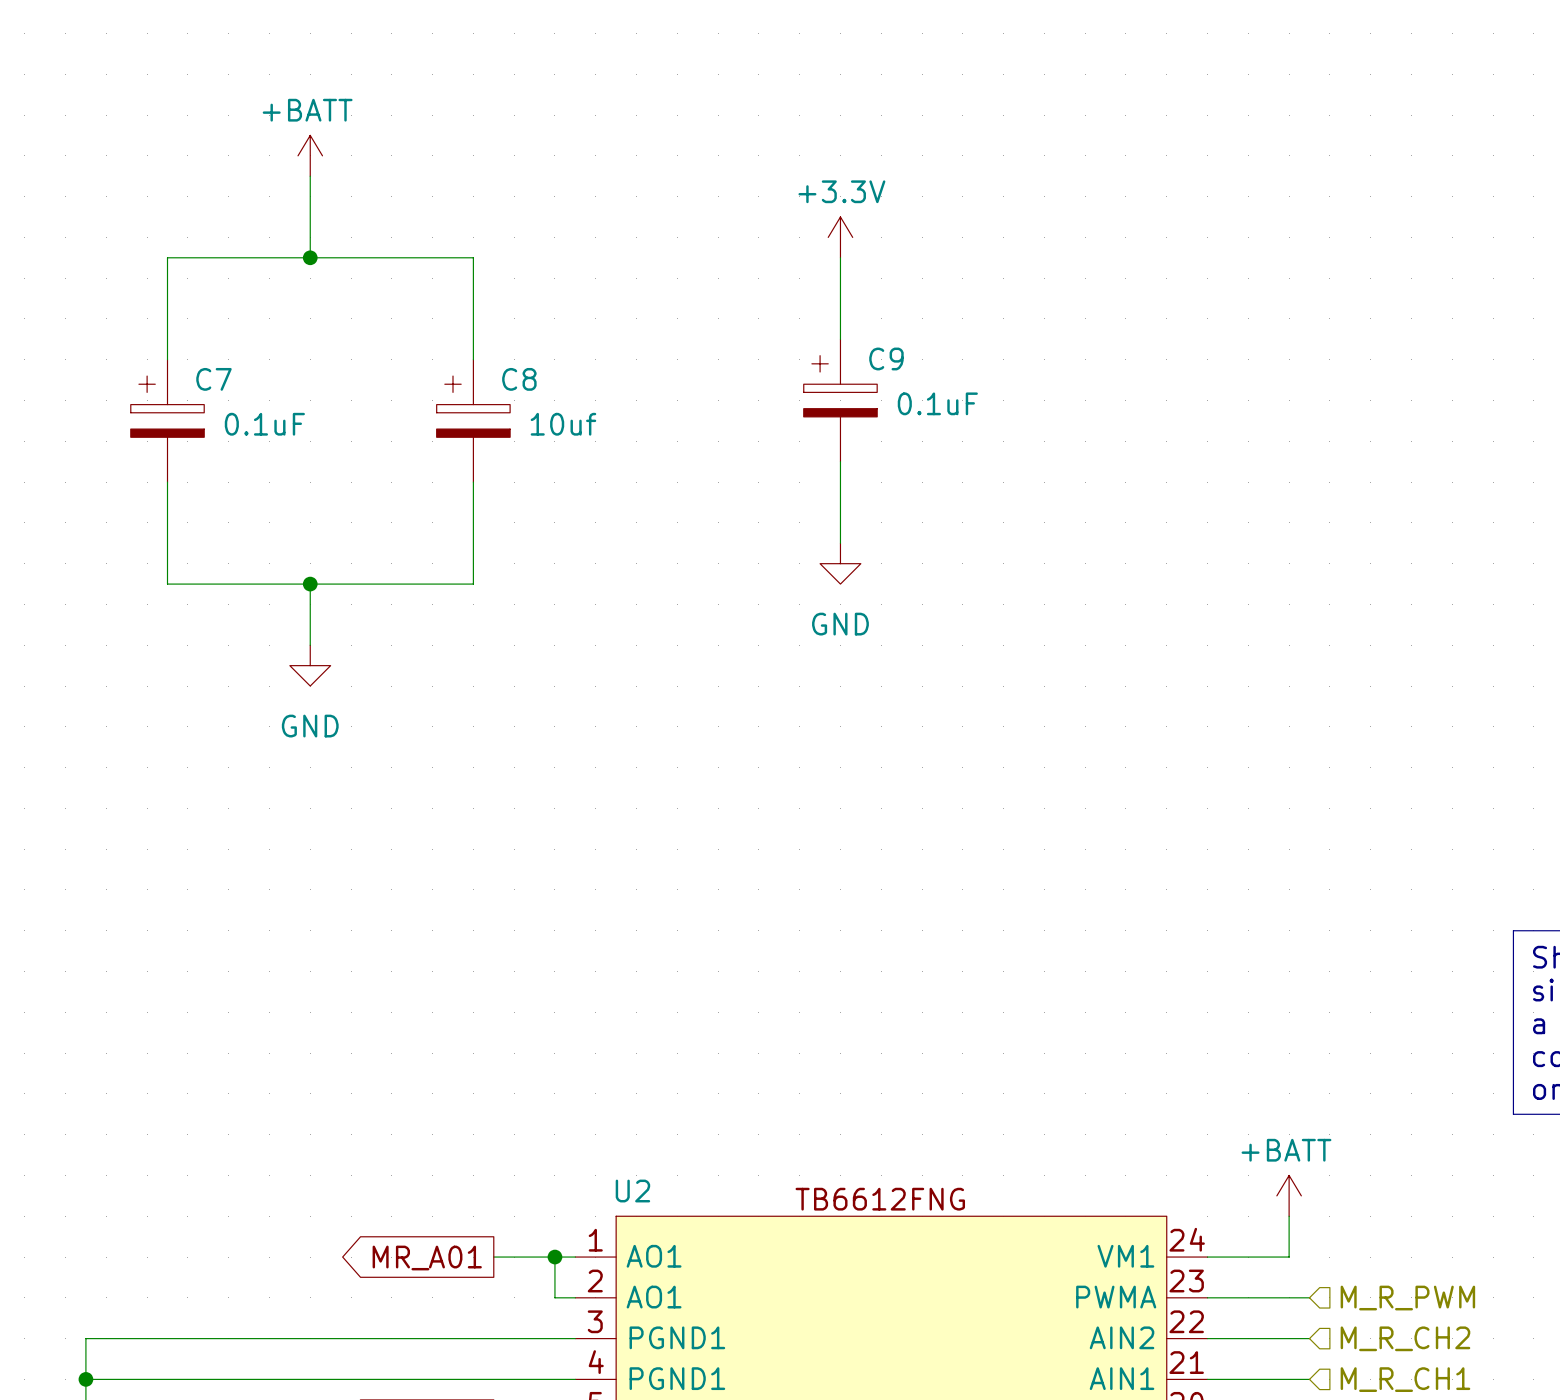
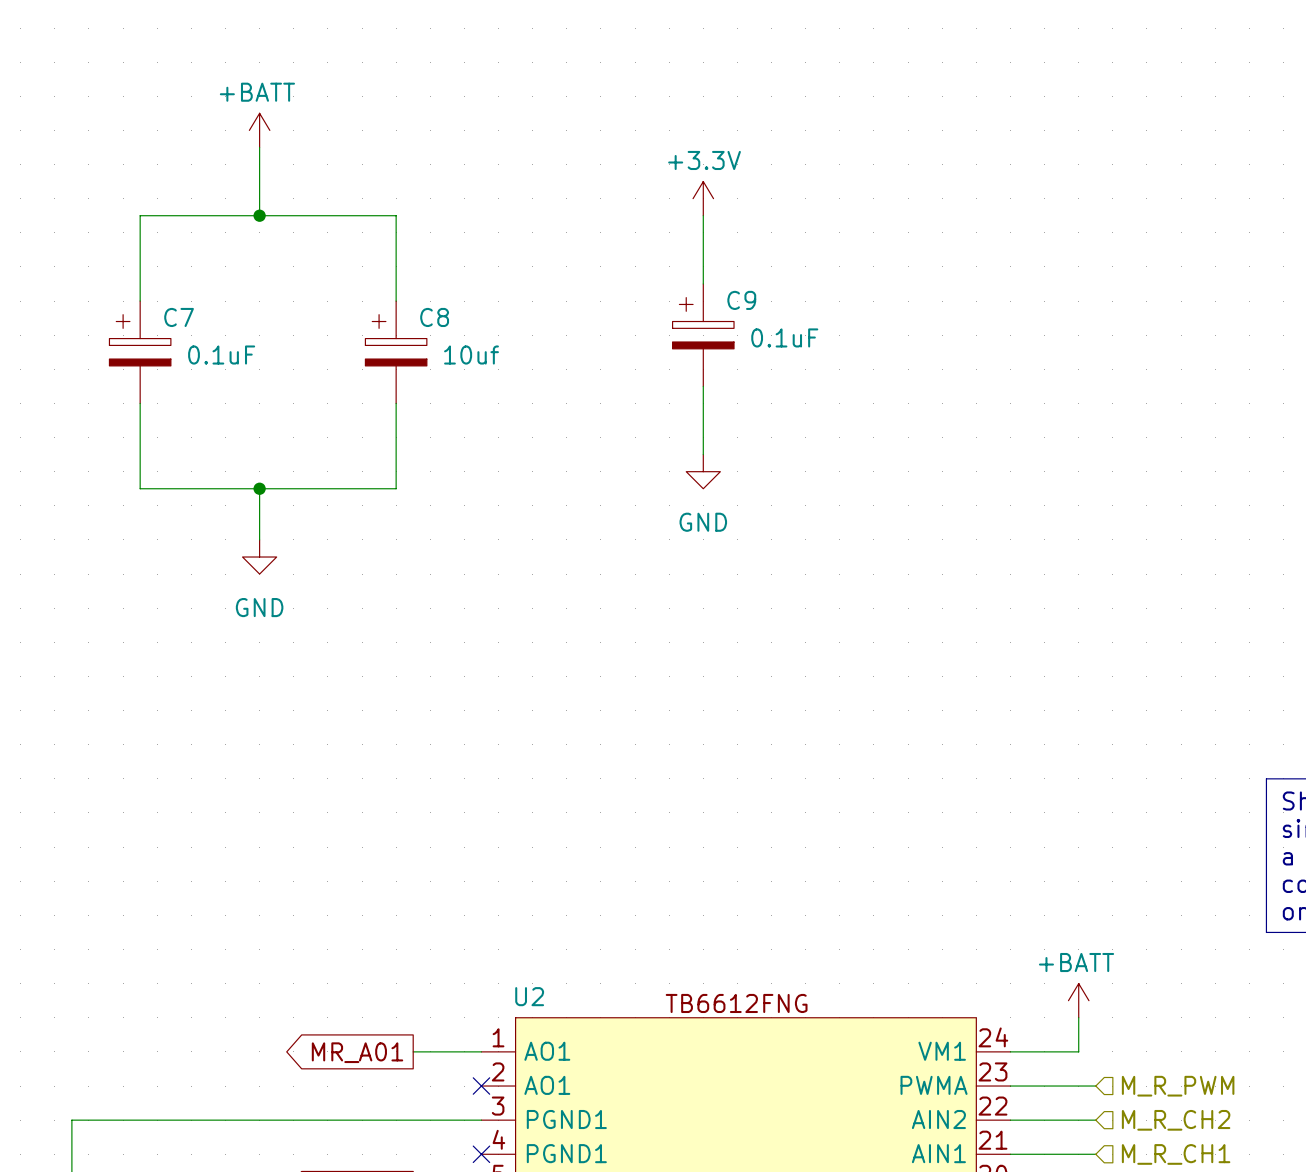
wire: (554, 1257) (554, 1297) (575, 1297) -> none
junction: (554, 1257) -> none
no-connect mark: none -> (481, 1086)
wire: (85, 1379) (575, 1379) -> none
junction: (85, 1379) -> none
no-connect mark: none -> (481, 1154)

